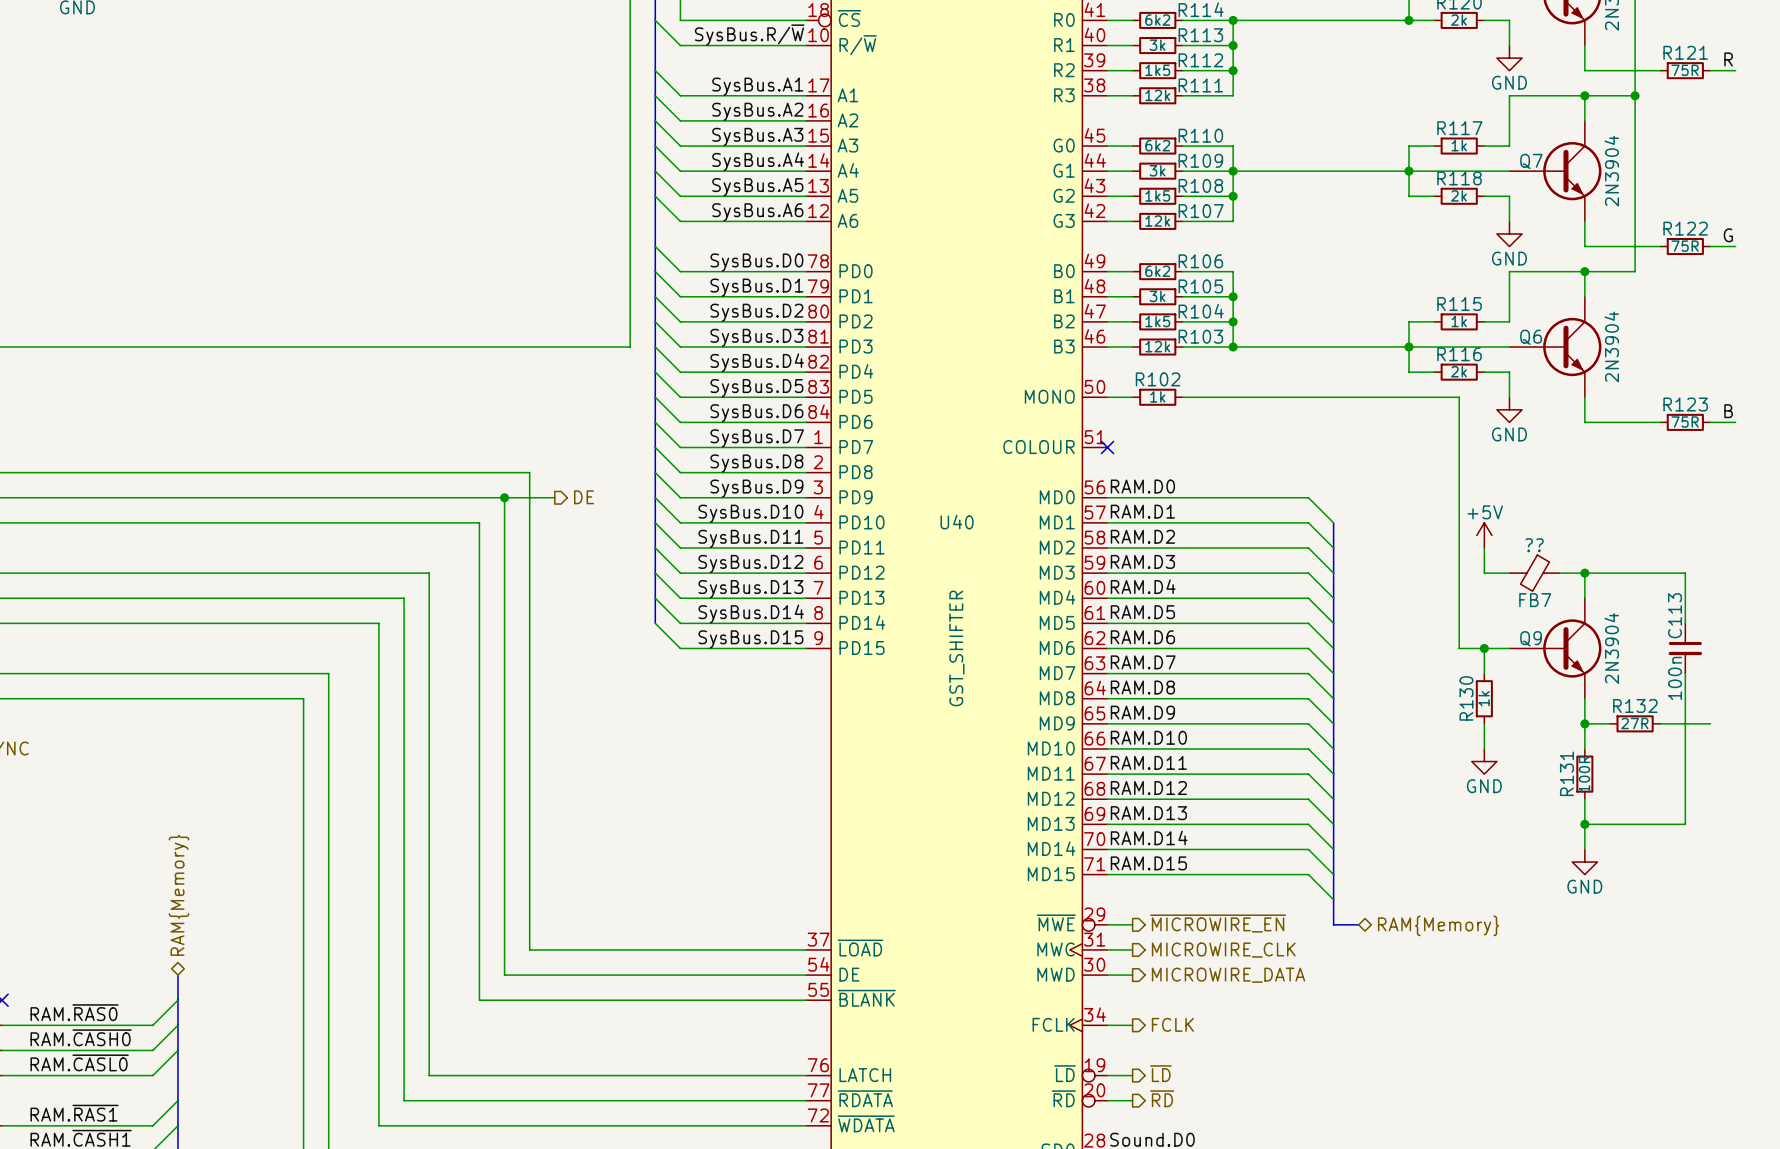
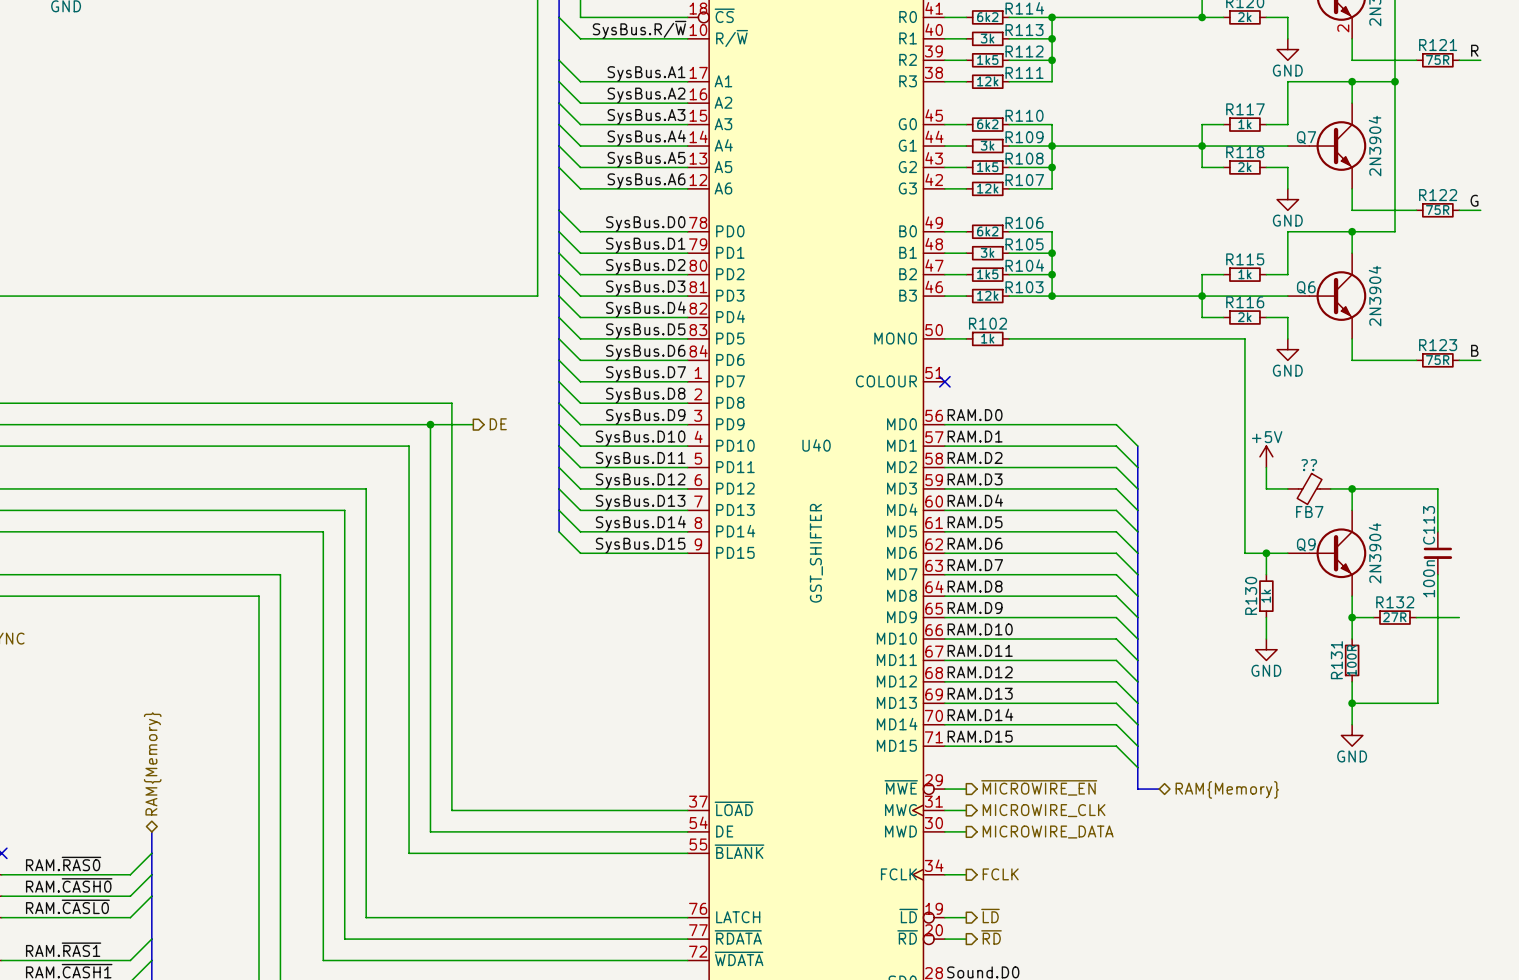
part pin number: none -> 2 (1343, 28)

